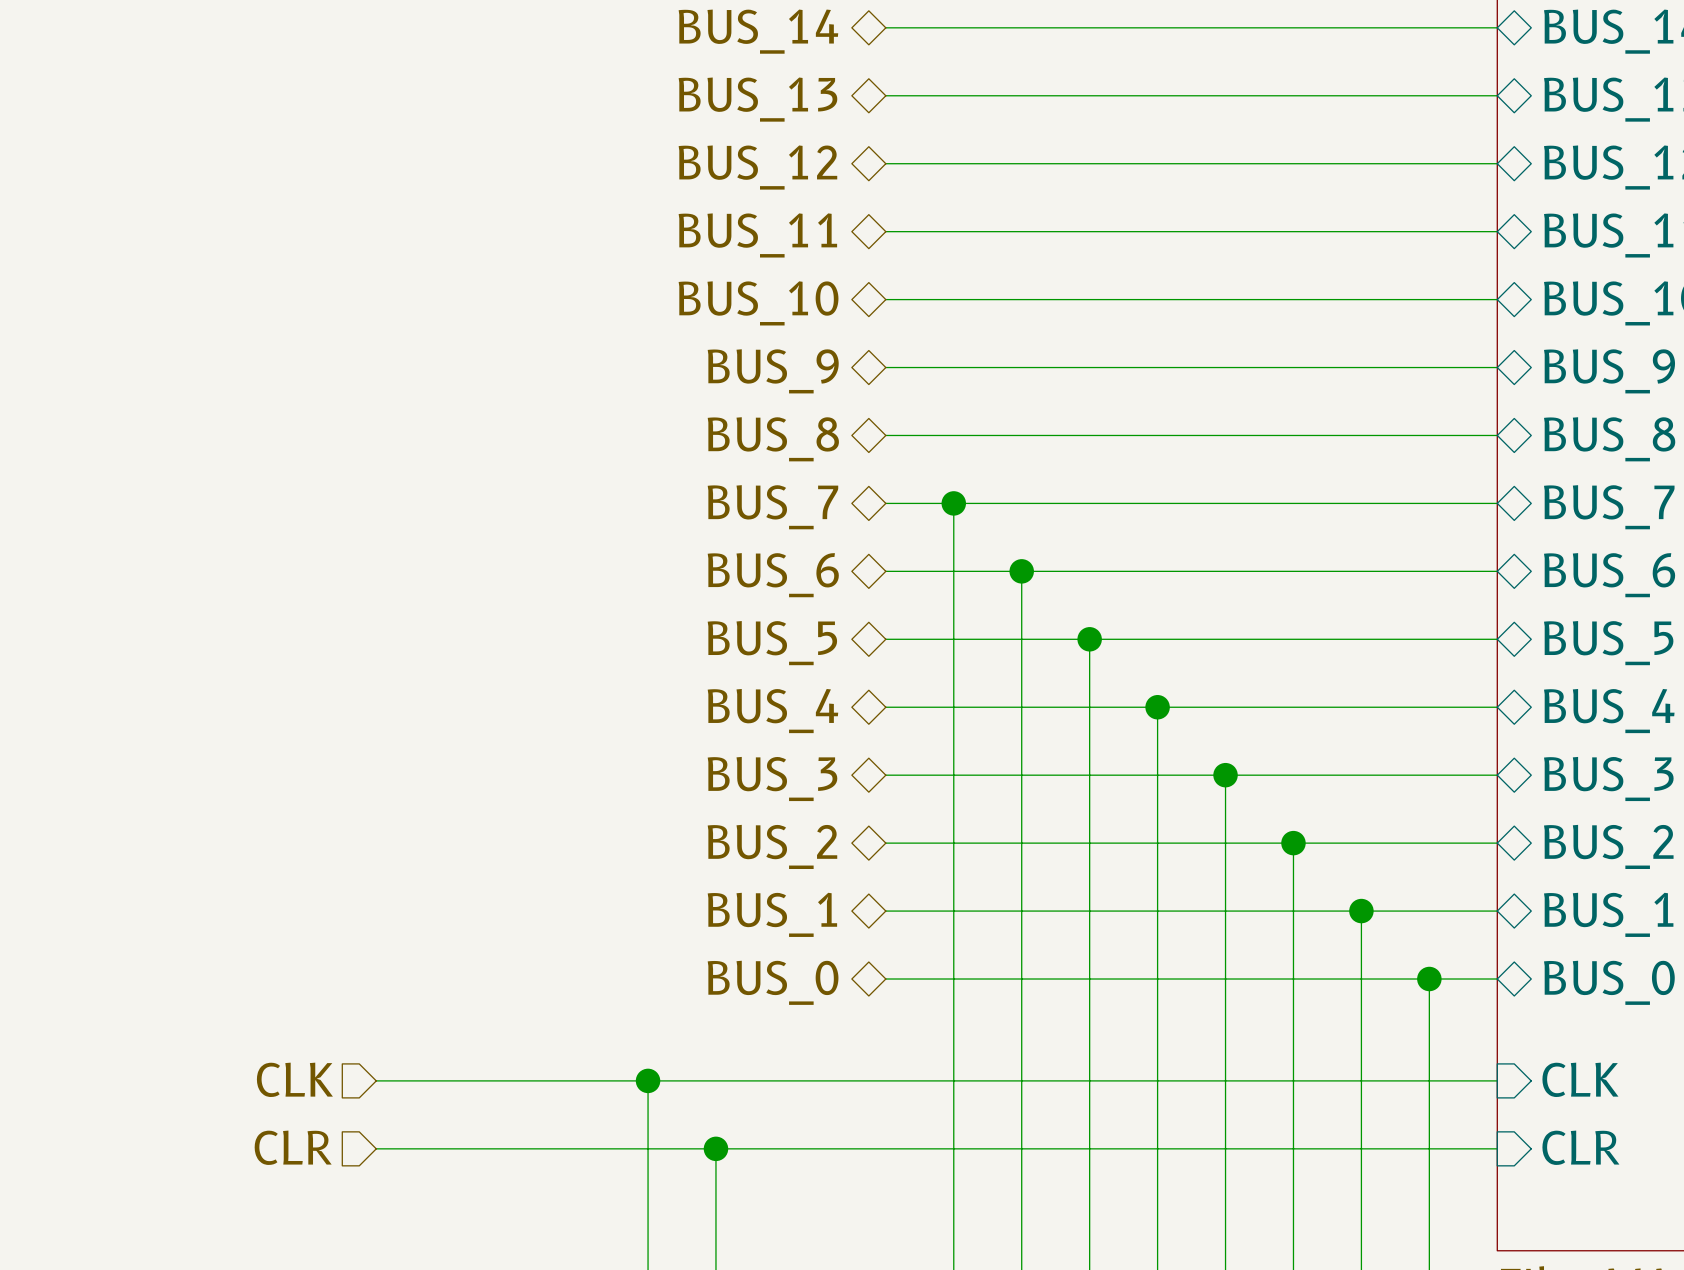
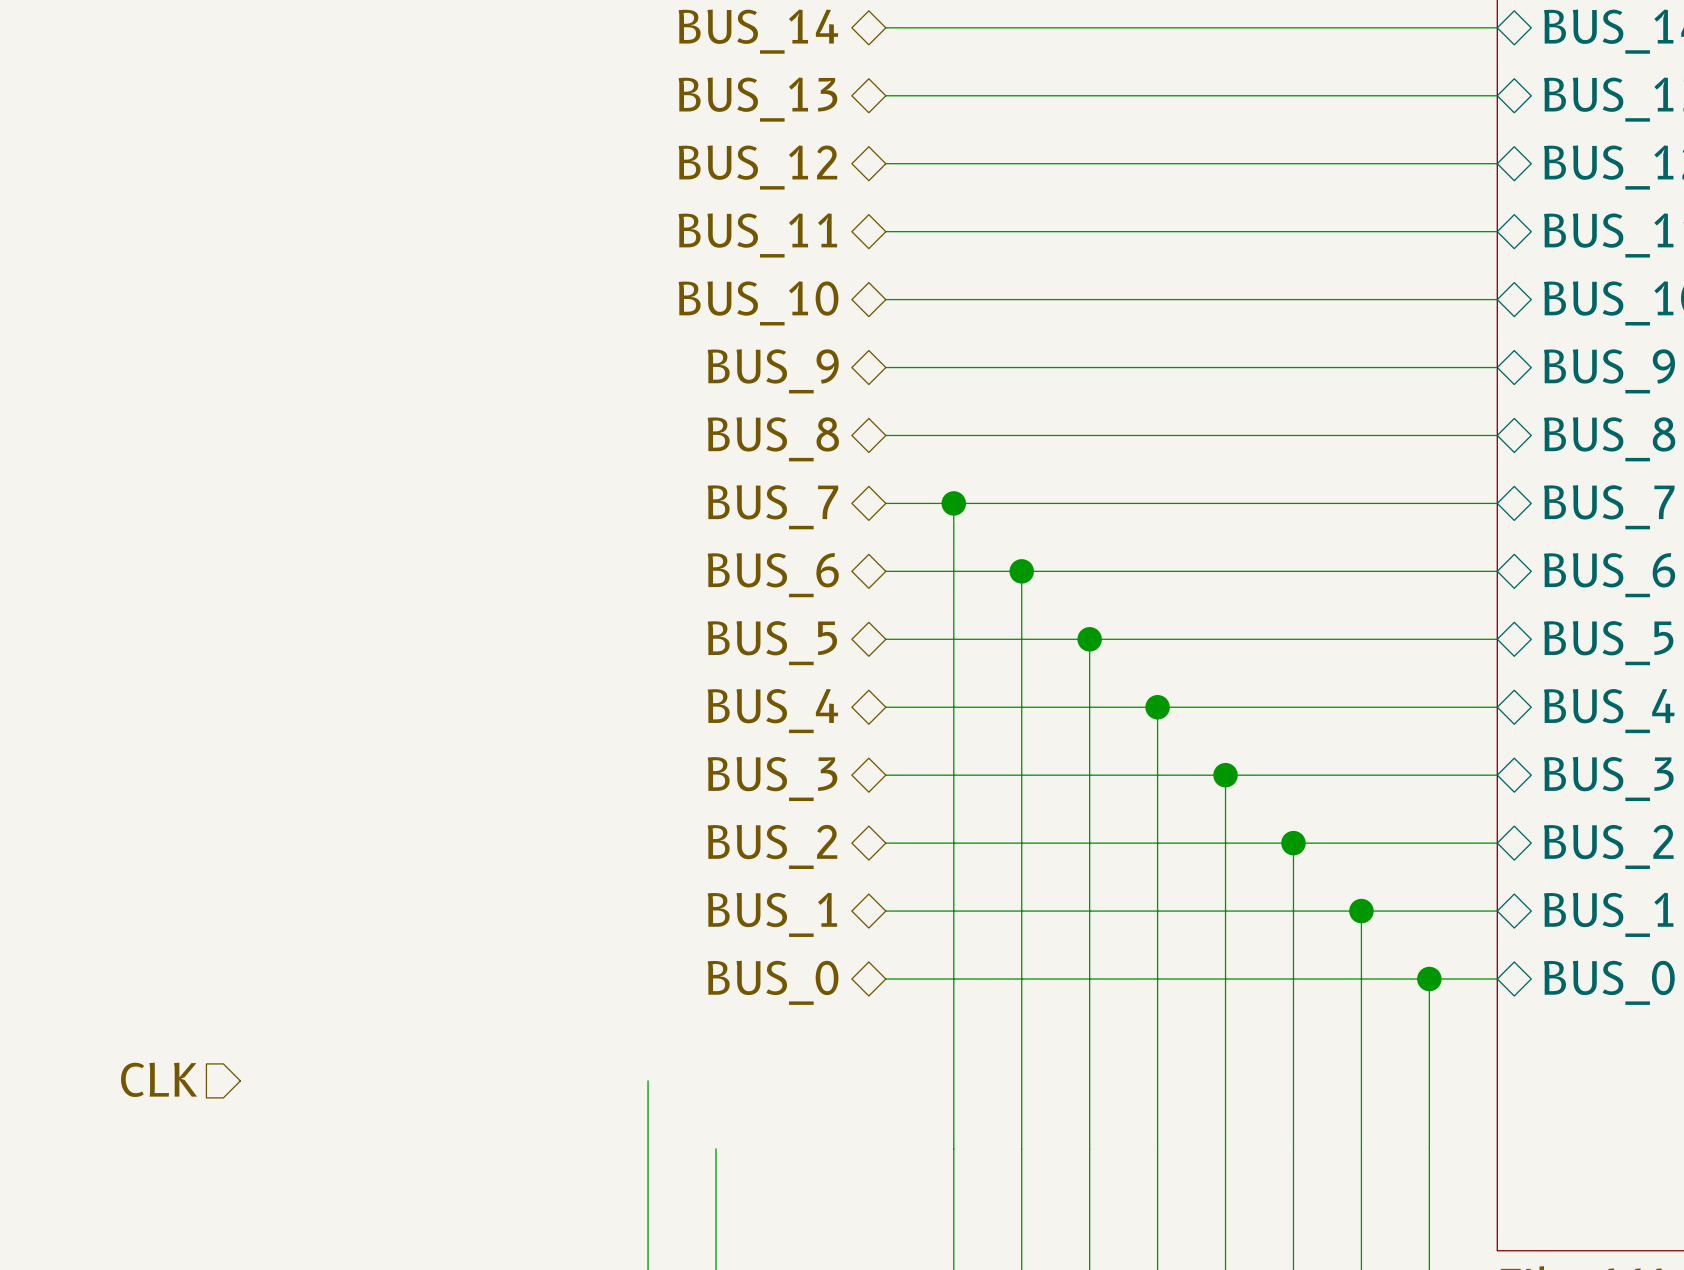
hierarchical label position: CLK (294, 1079) -> CLK (159, 1079)
sheet pin: CLK (1580, 1079) -> none
wire: (376, 1080) (1497, 1080) -> none
junction: (648, 1080) -> none
hierarchical label: CLR (293, 1147) -> none
sheet pin: CLR (1580, 1147) -> none
wire: (376, 1148) (1497, 1148) -> none
junction: (715, 1148) -> none

